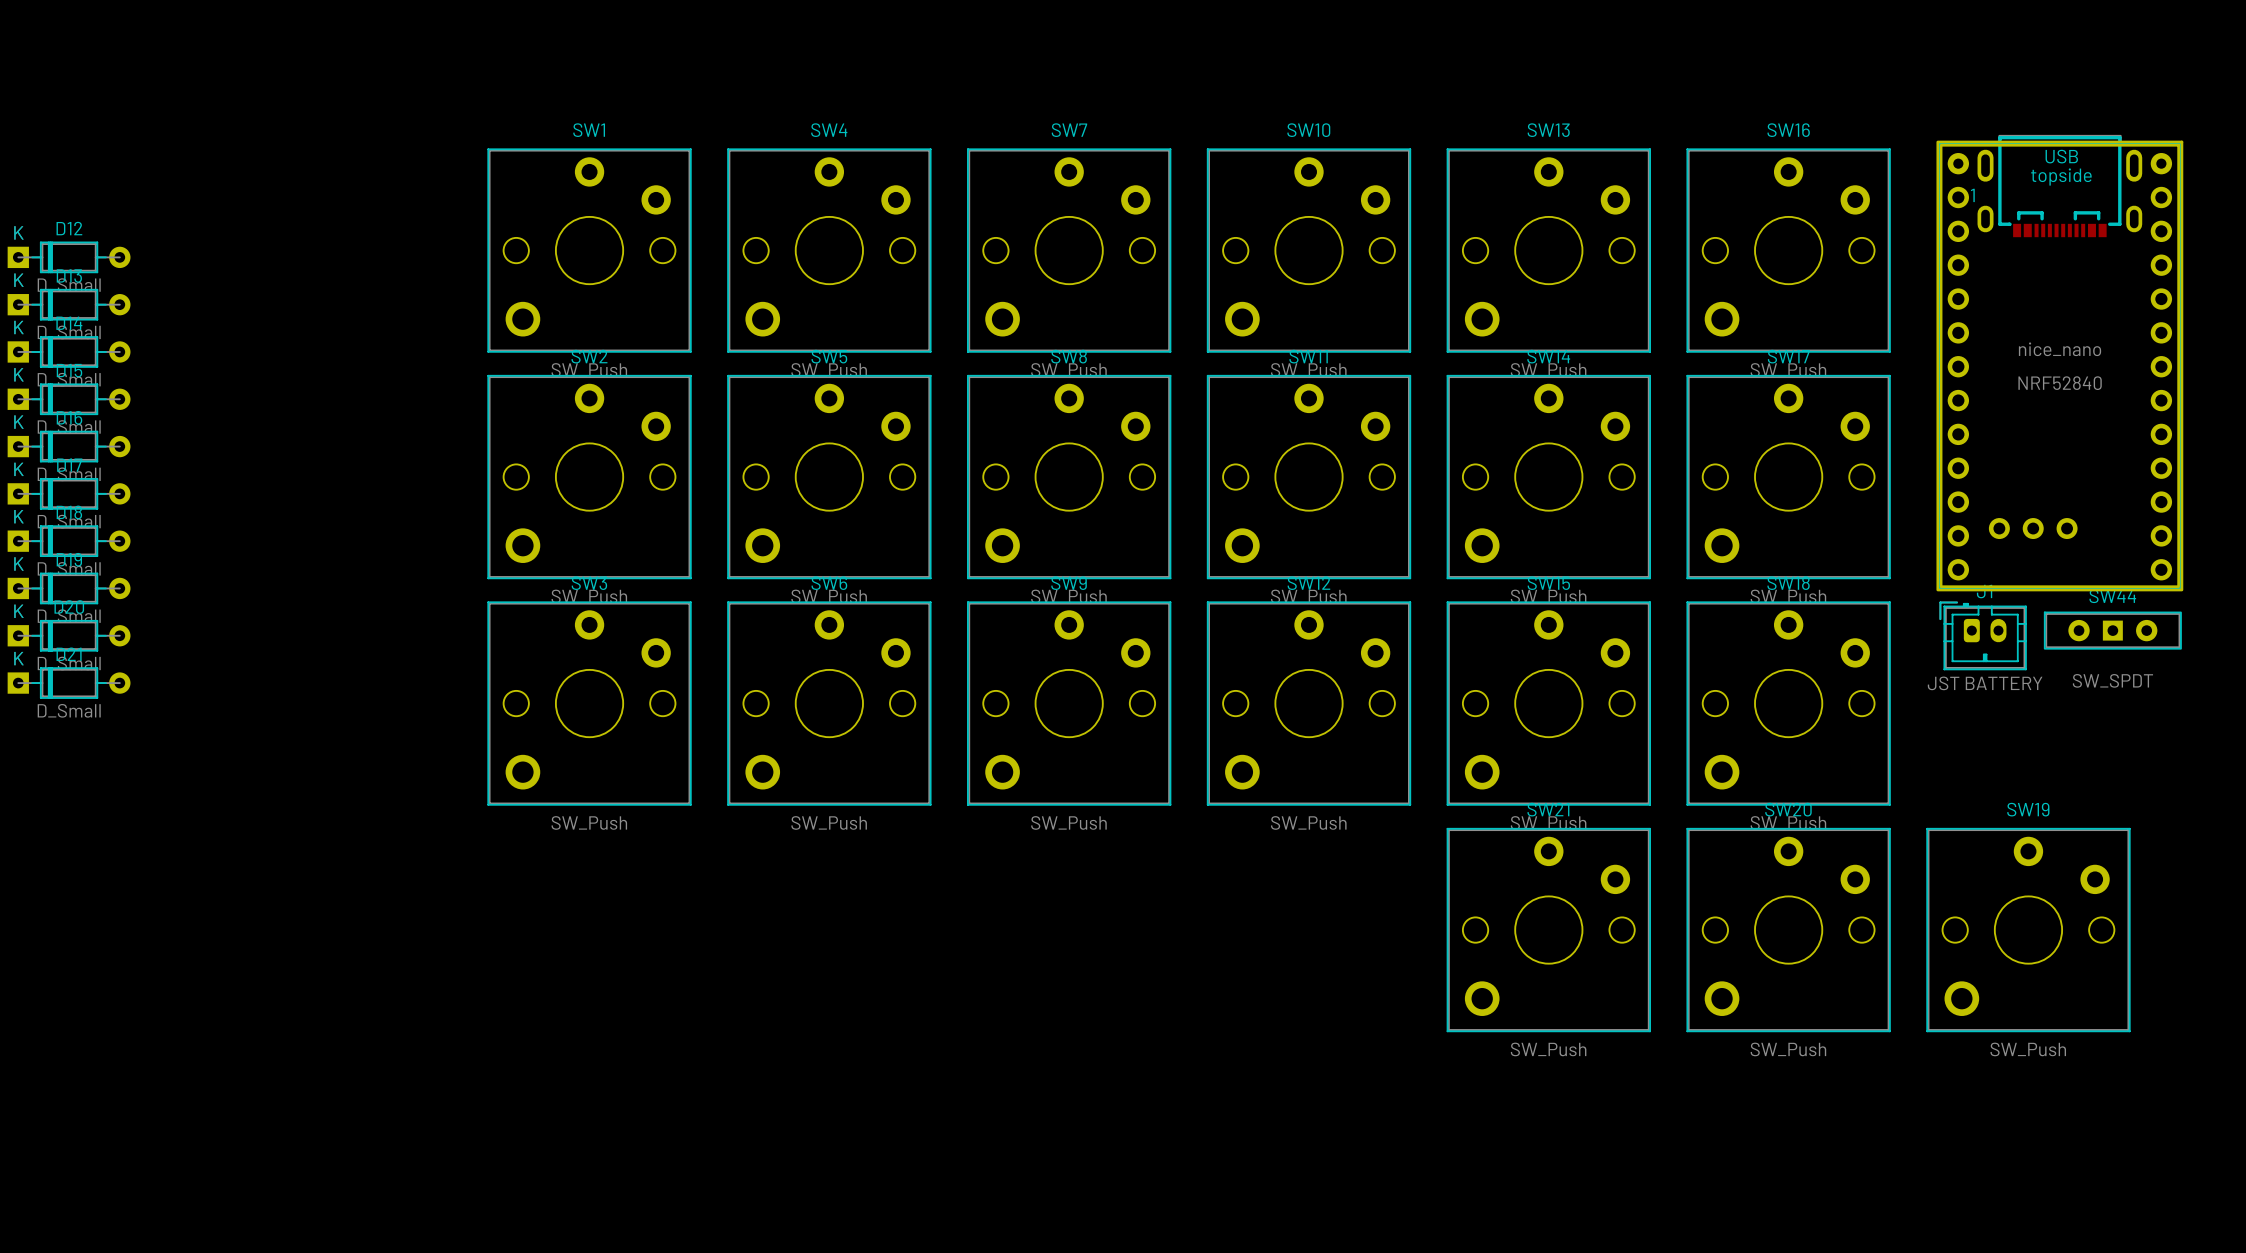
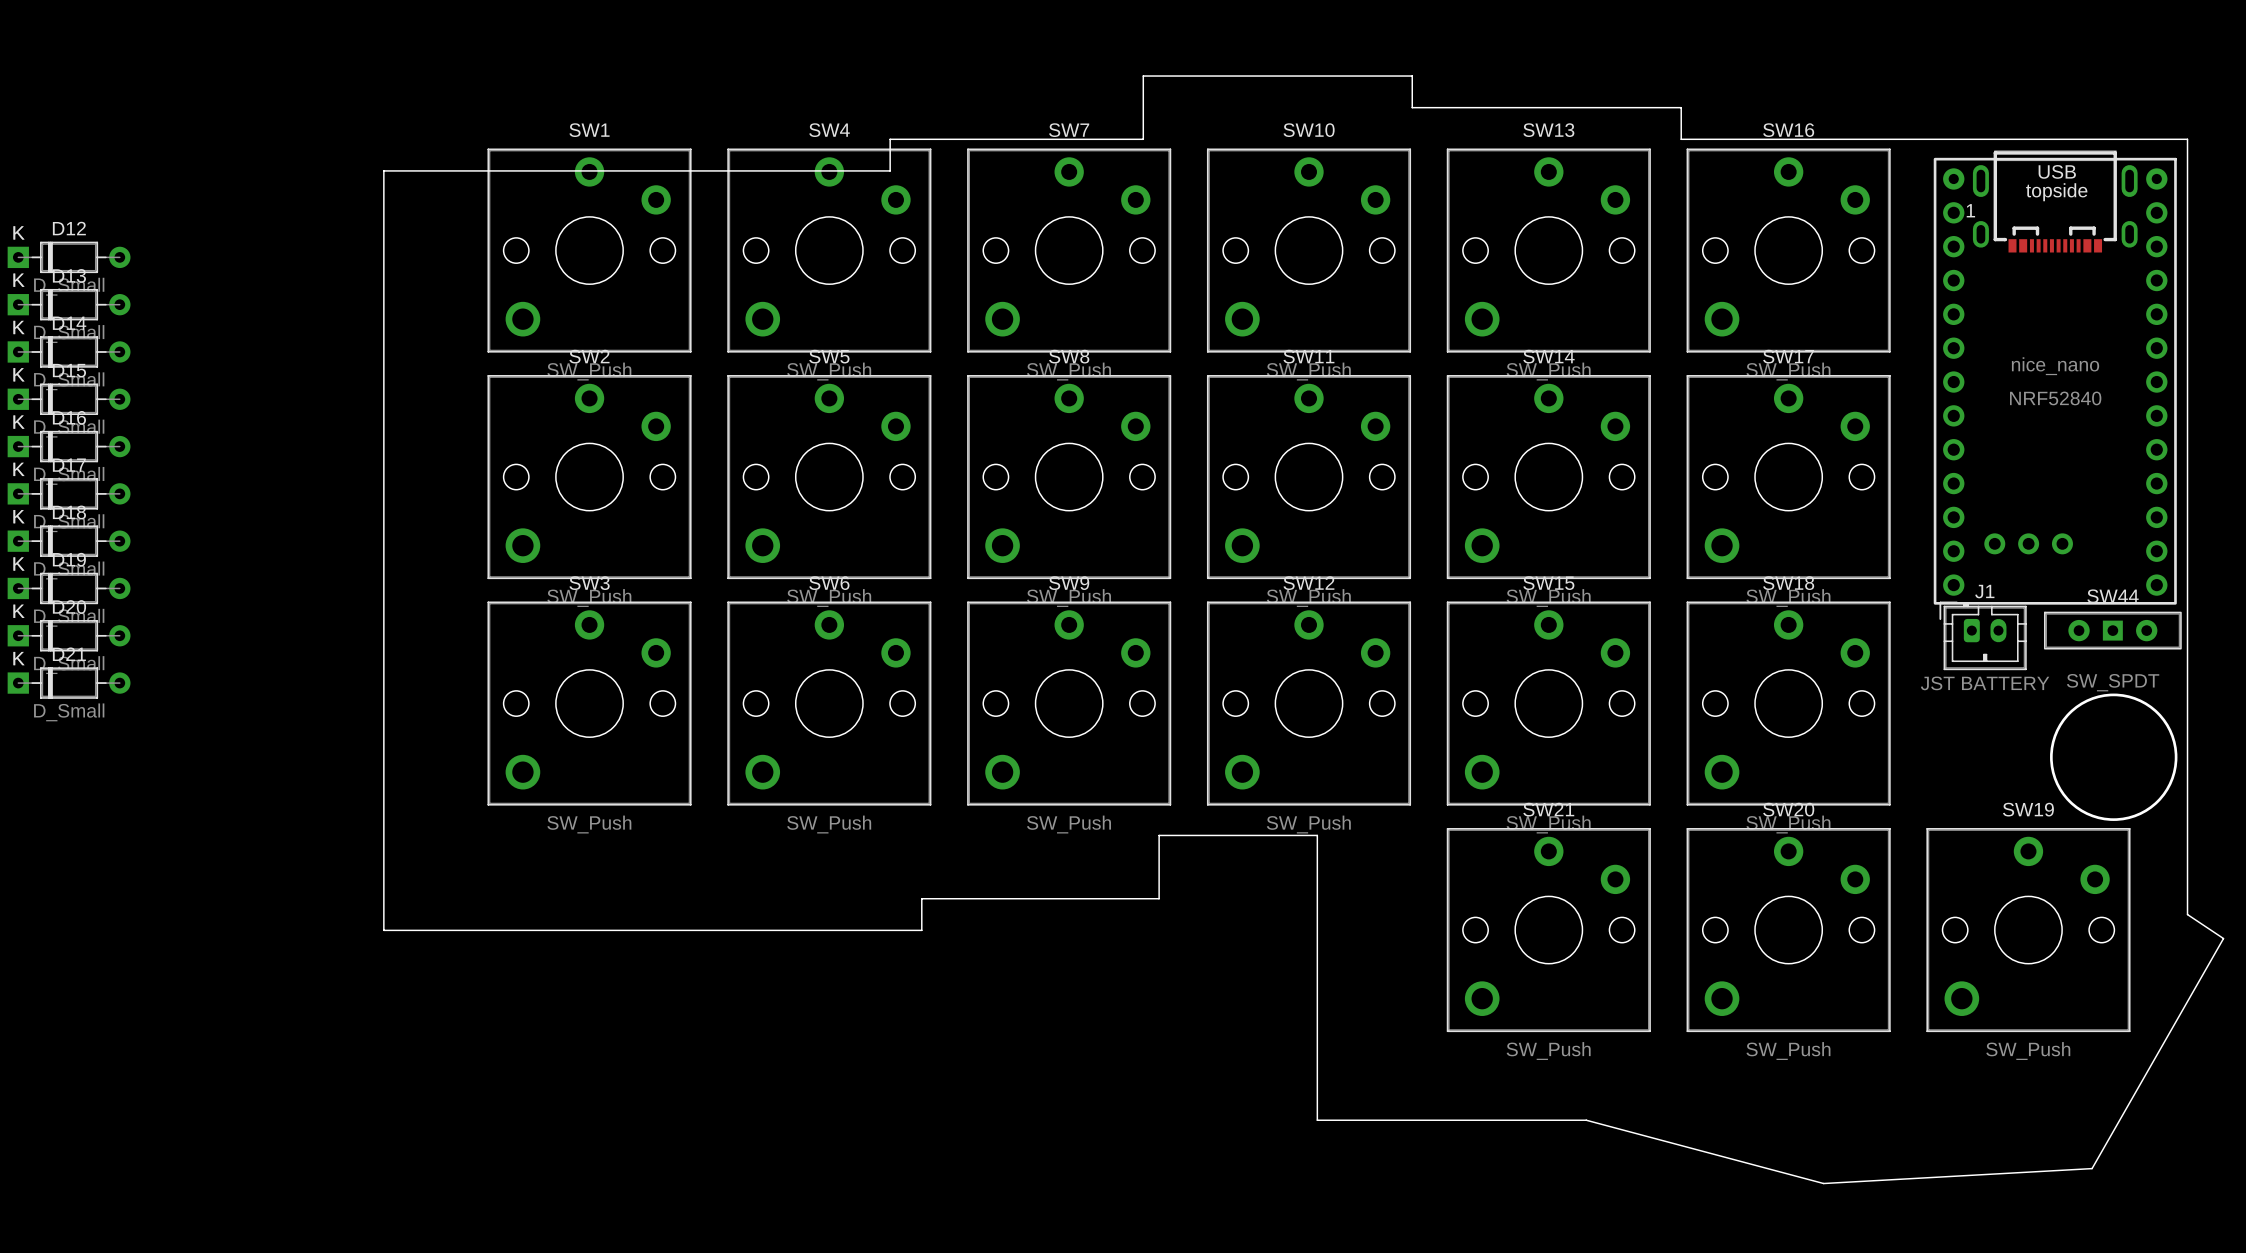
board edge: none -> (1143, 76) (1143, 139) (890, 139) (890, 170) (383, 170) (383, 930) (921, 930) (921, 898) (1159, 898) (1159, 835) (1317, 835) (1317, 1120) (1586, 1120) (1823, 1183) (2092, 1168) (2223, 938) (2187, 914) (2187, 139) (1681, 139) (1681, 107) (1412, 107) (1412, 76) (1143, 76)
part: nice_nano (2059, 363) -> none
part: none -> nice_nano (2055, 377)
round board edge: none -> [2050, 693, 2178, 821]

